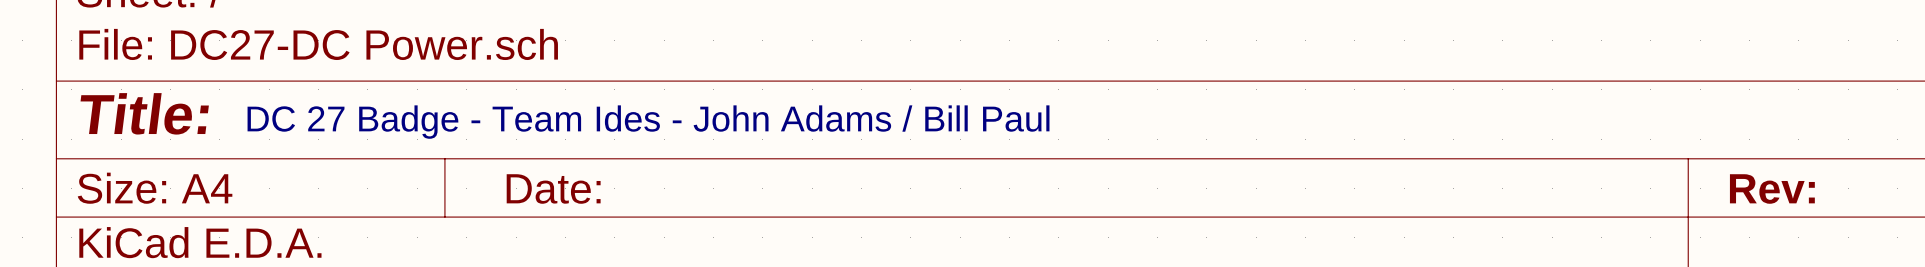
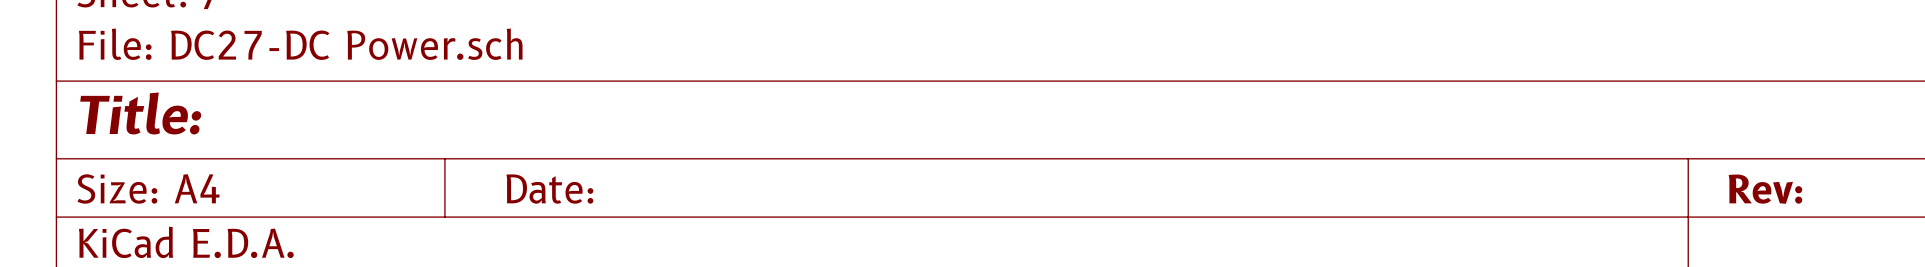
text: DC 27 Badge - Team Ides - John Adams / Bill Paul (648, 122) -> none

